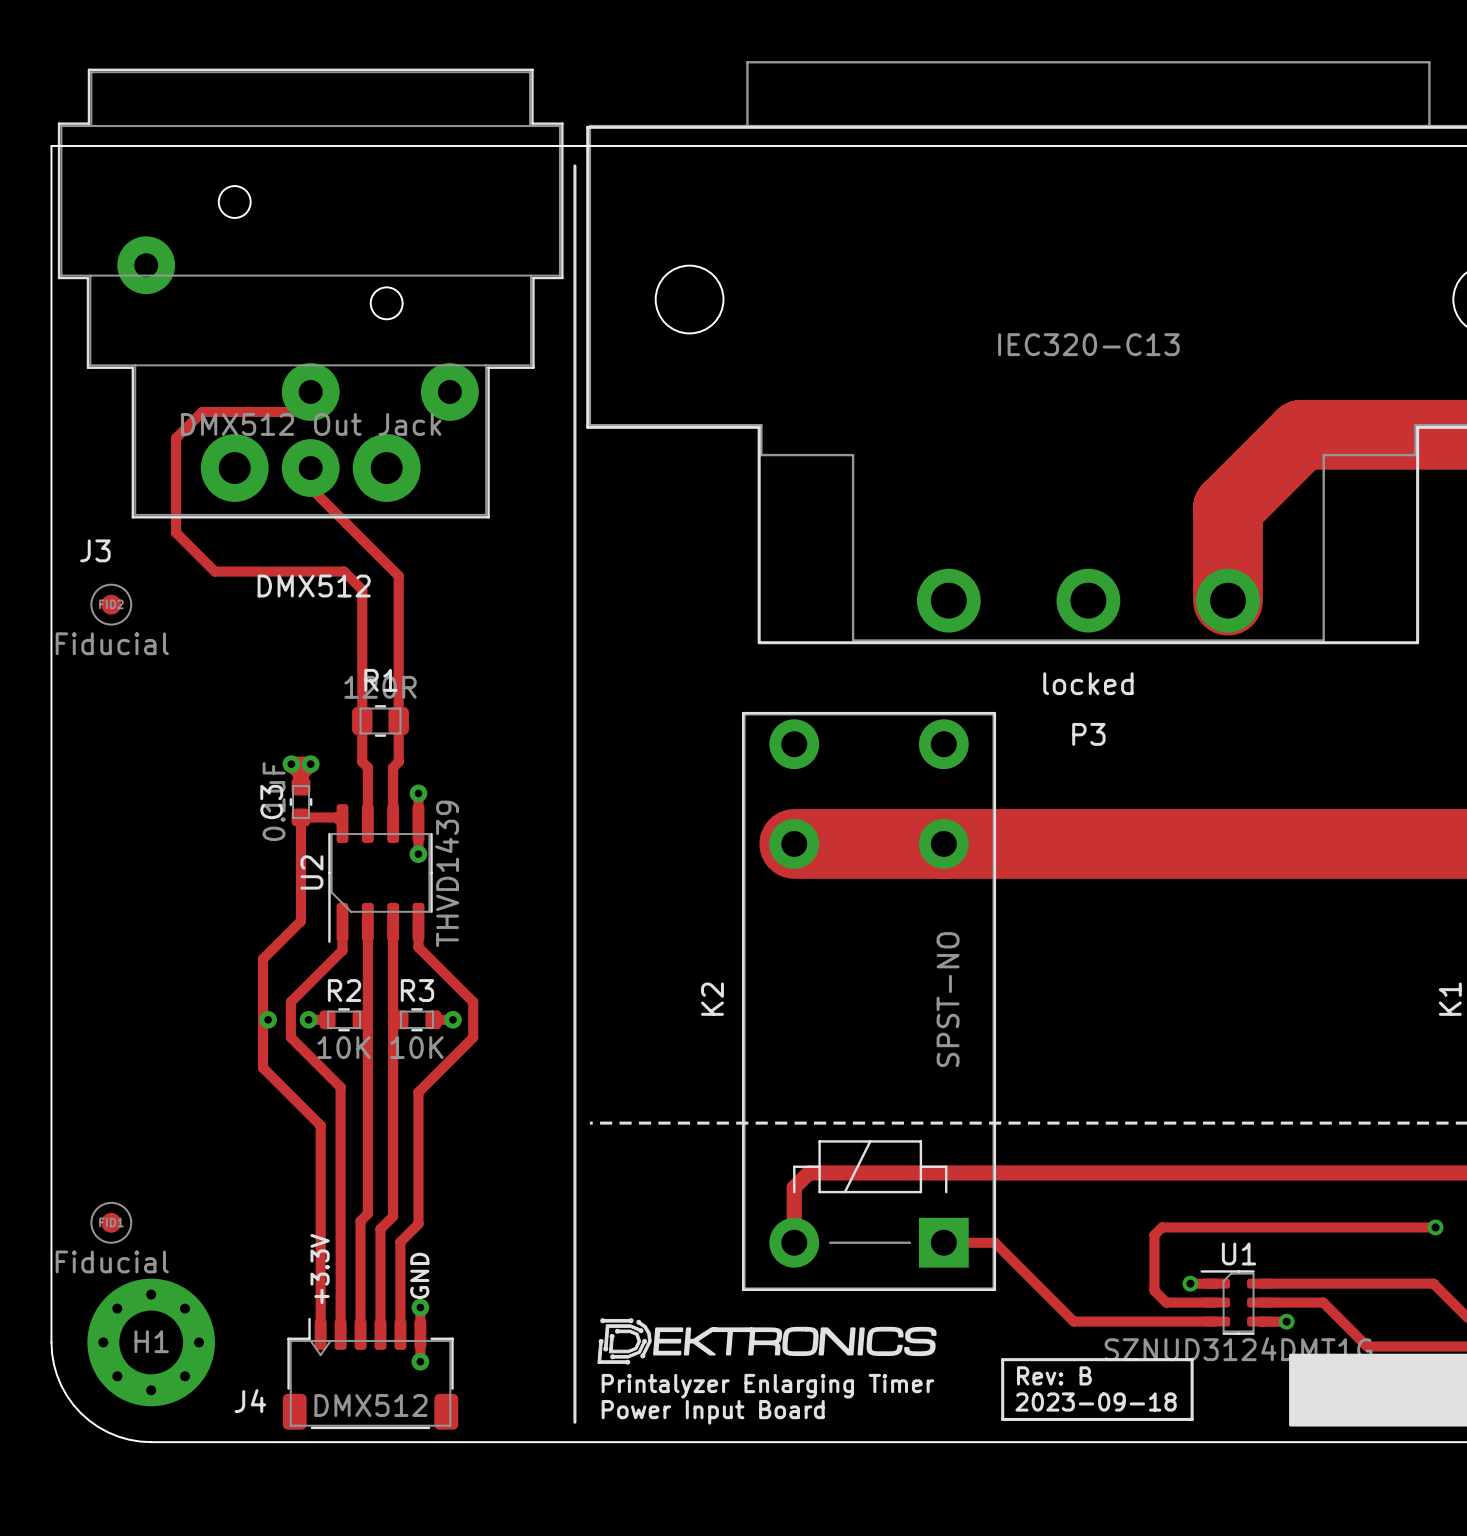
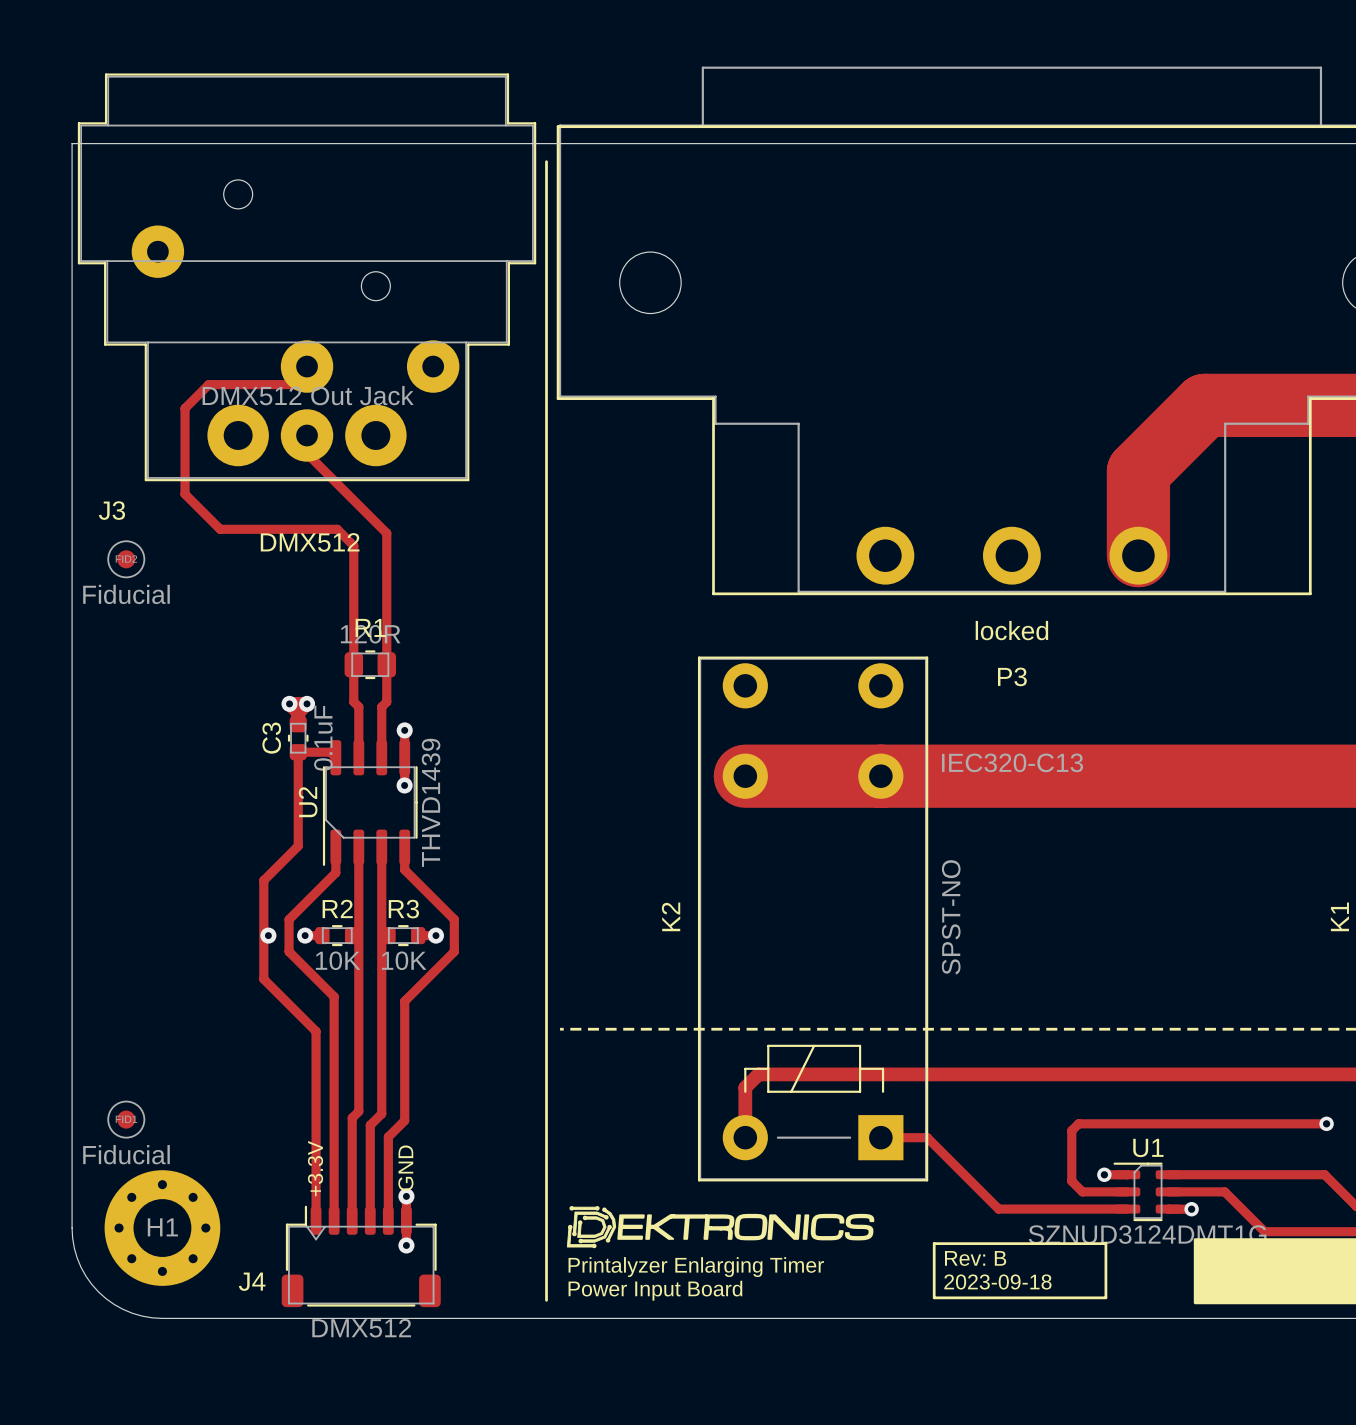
P3 value position: IEC320-C13 (1088, 344) -> IEC320-C13 (1012, 762)
C3 value position: 0.1uF (274, 801) -> 0.1uF (323, 738)
K2 value position: SPST-NO (948, 999) -> SPST-NO (951, 917)
J4 value position: DMX512 (371, 1405) -> DMX512 (361, 1328)

